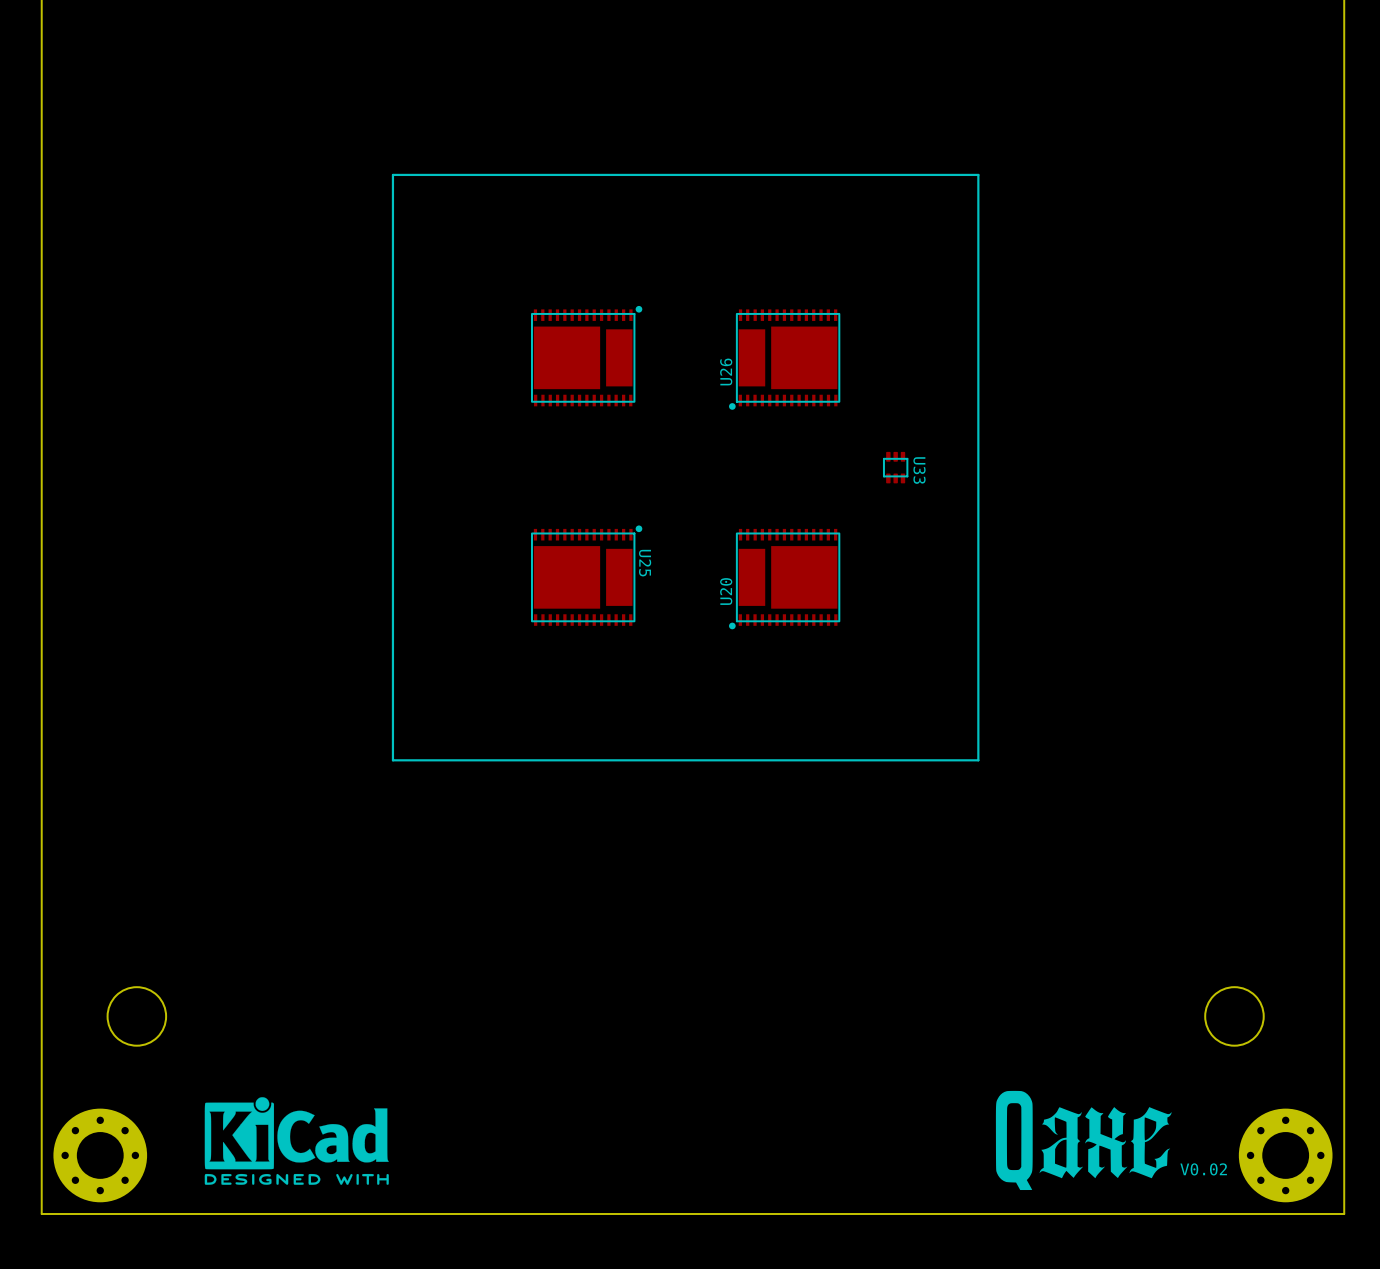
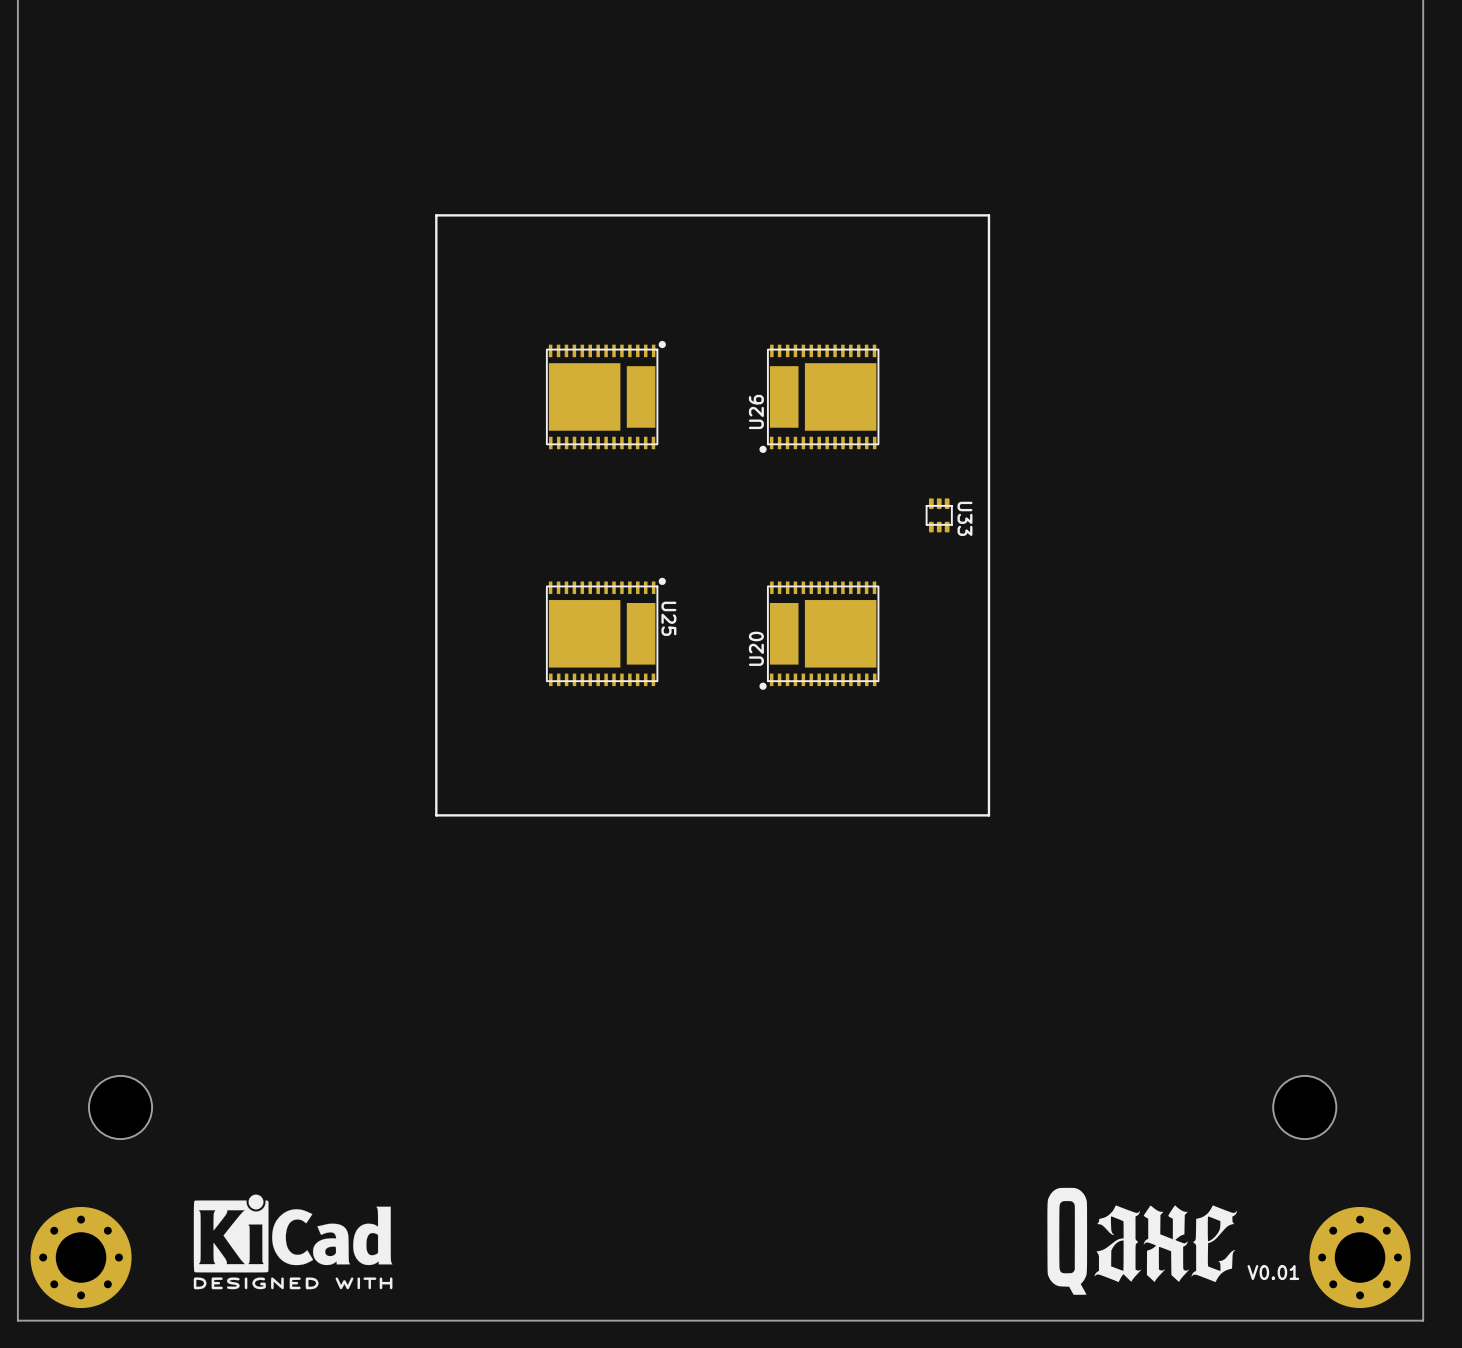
line: (392, 174) (978, 174) (978, 760) (392, 760) (392, 174) -> (436, 215) (436, 815) (988, 815) (988, 215) (436, 215)
text: V0.02 (1203, 1169) -> V0.01 (1273, 1272)

